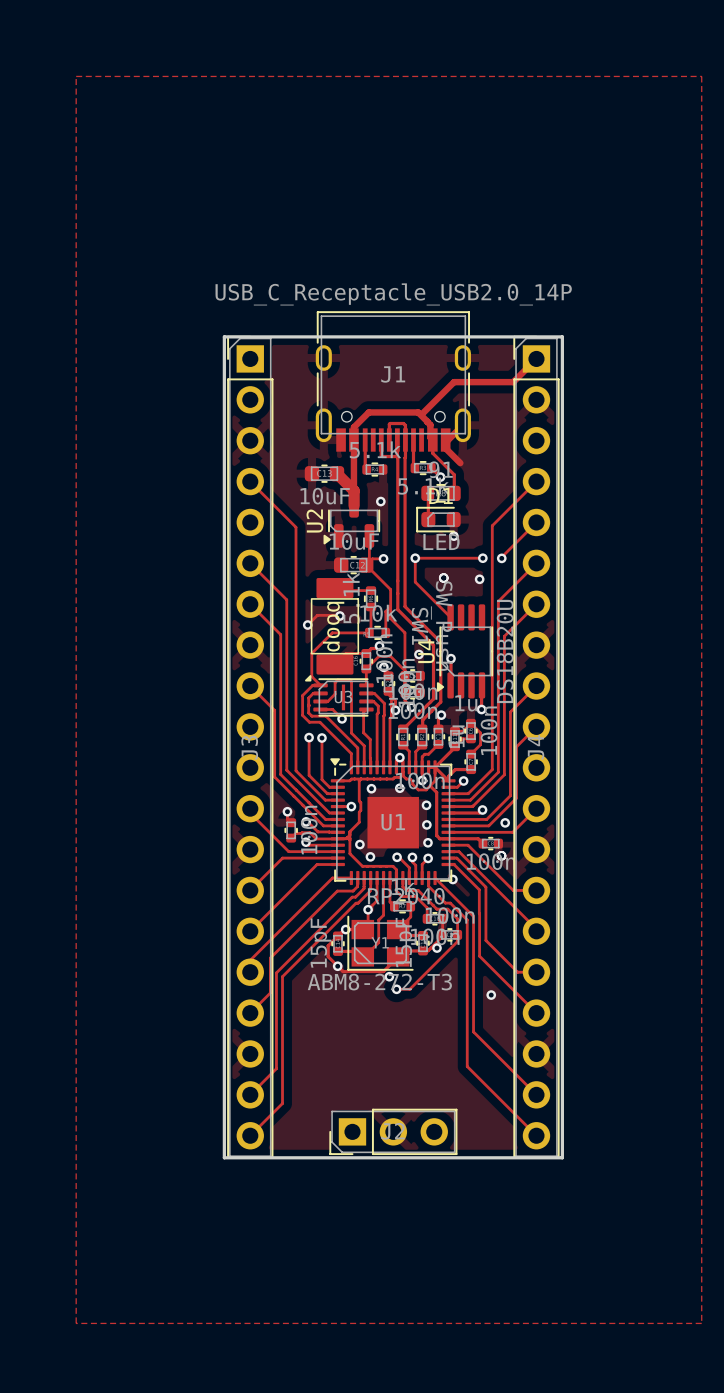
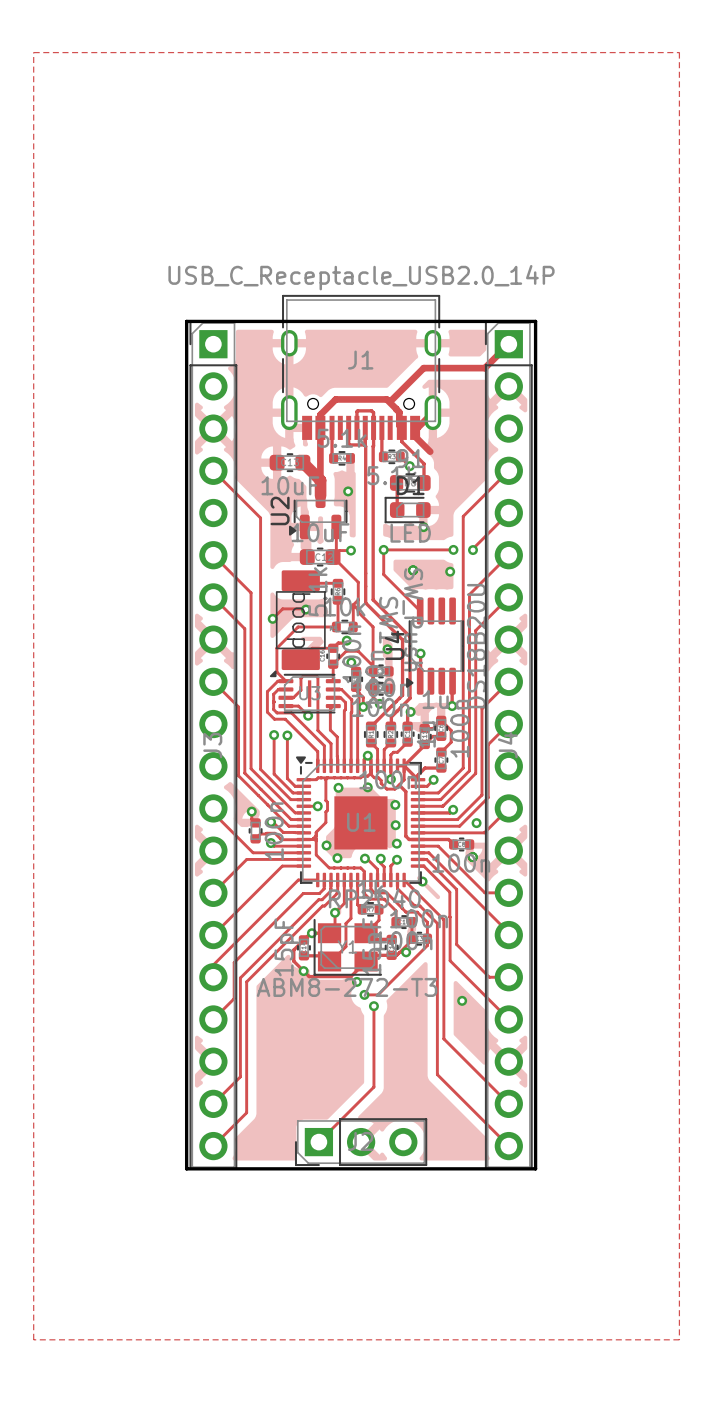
track: none -> (373, 1006) (373, 1087) (318, 1142)
via: none -> (373, 1006)

